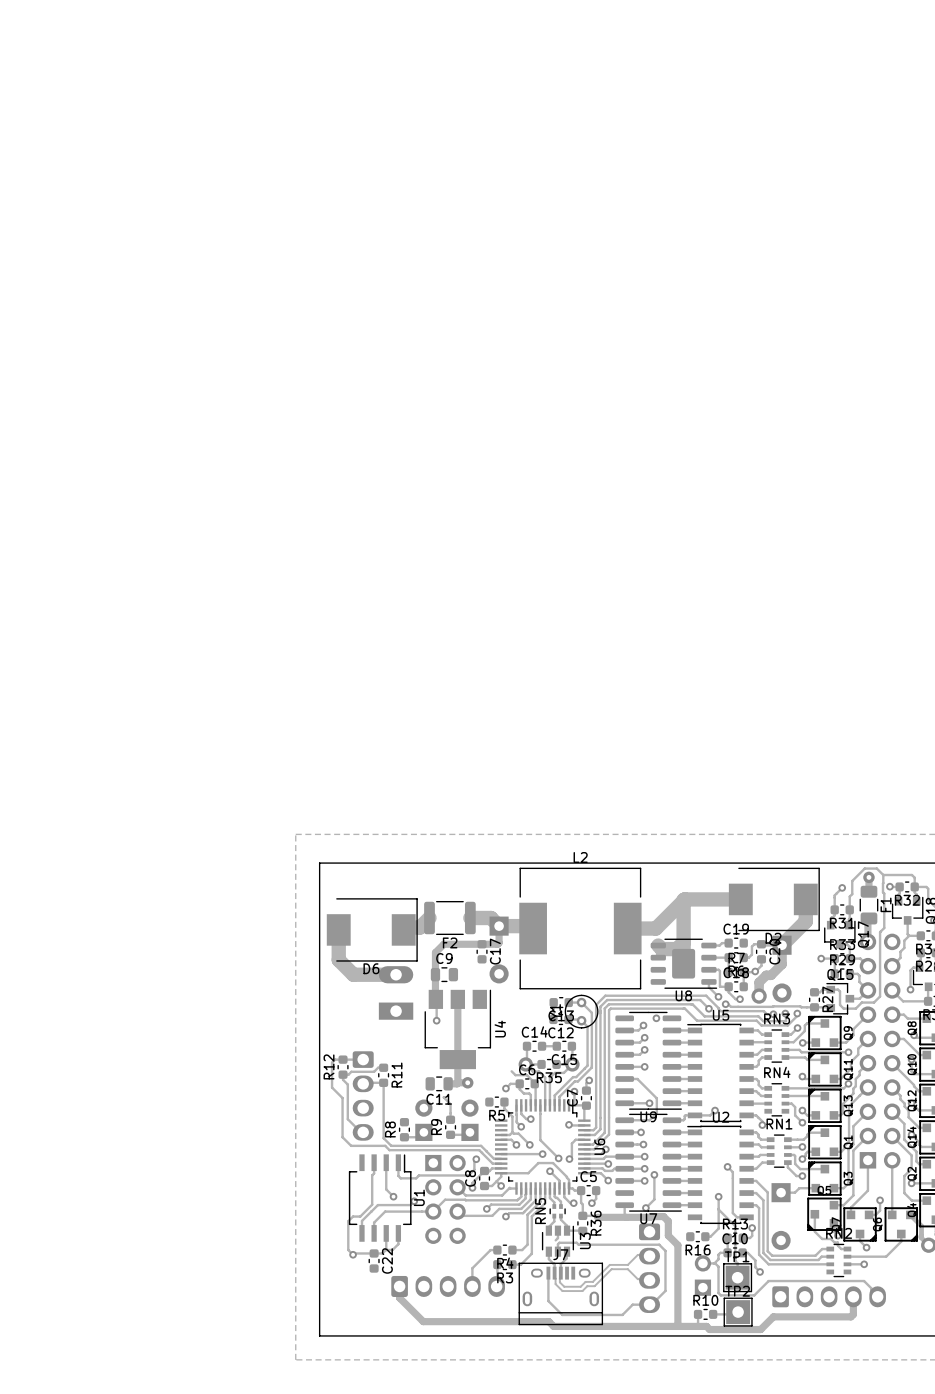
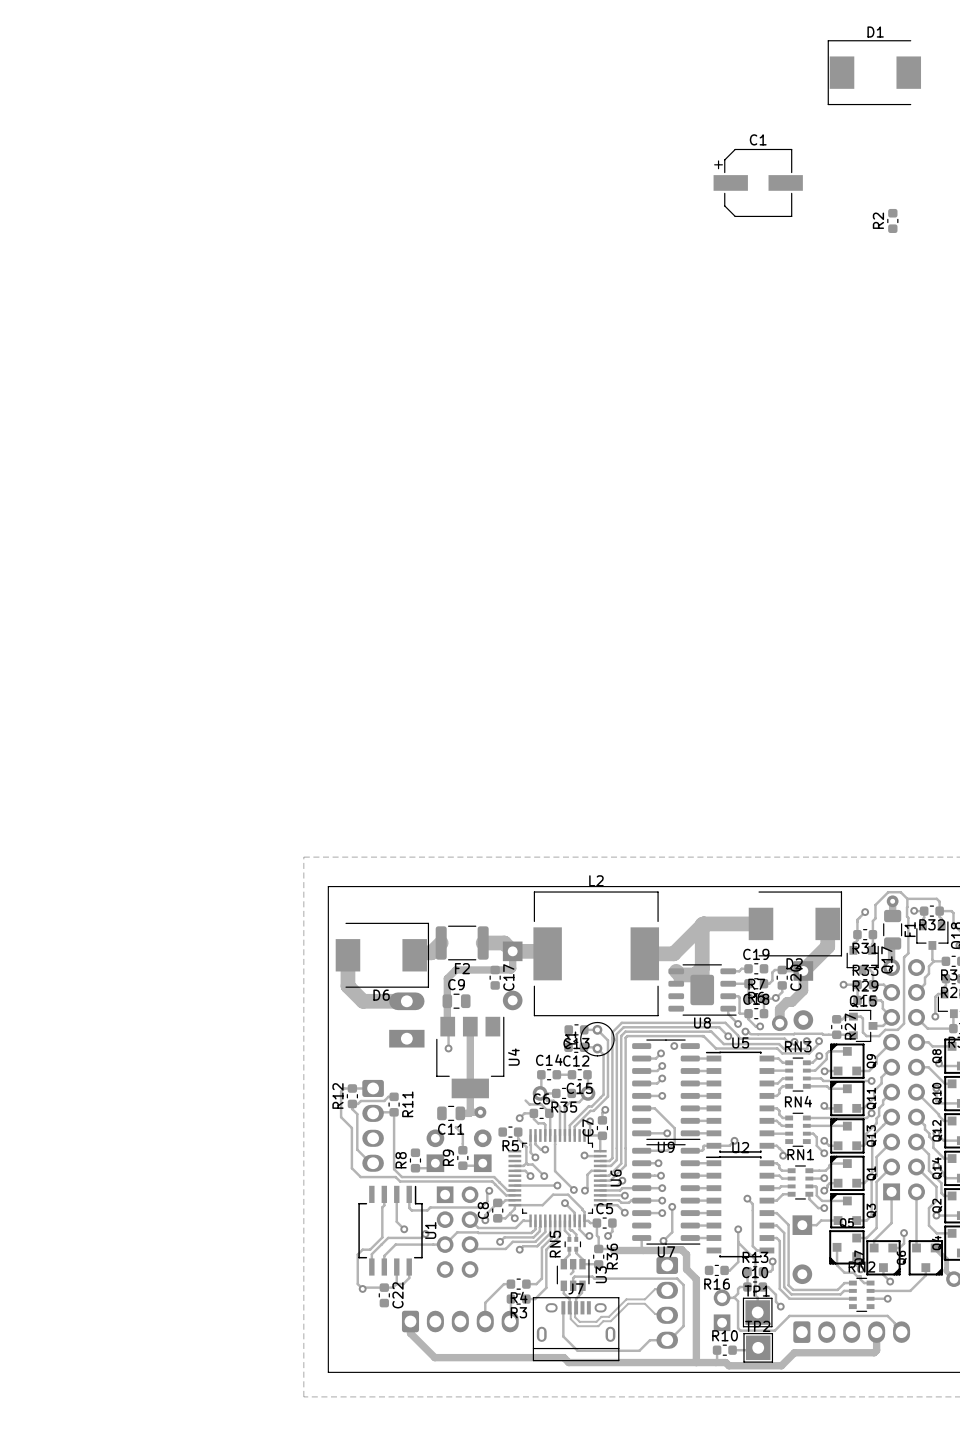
D1: none -> (874, 72)
C1: none -> (758, 182)
R2: none -> (892, 220)

